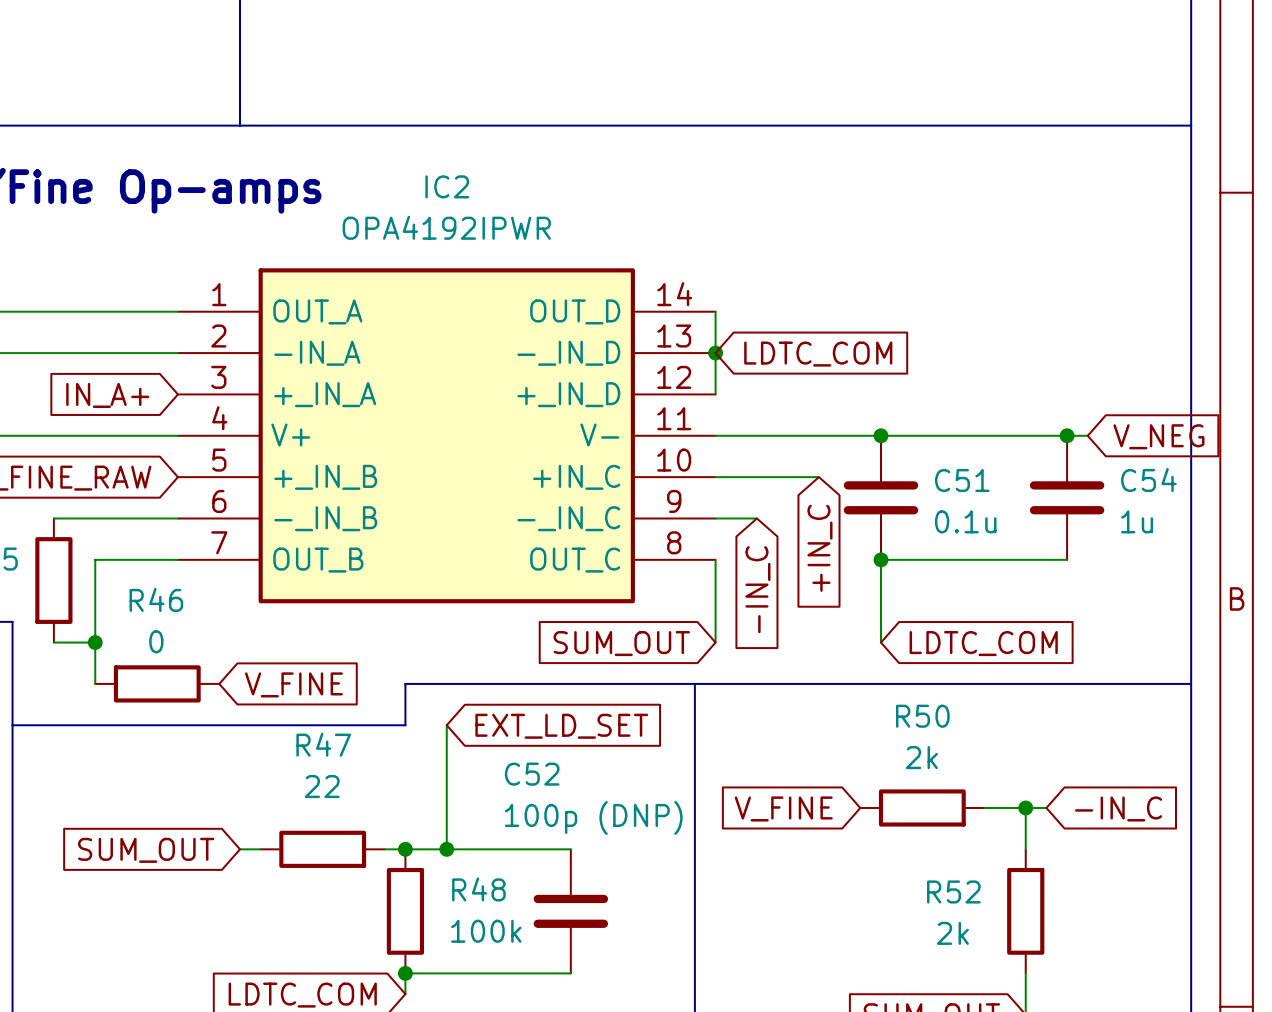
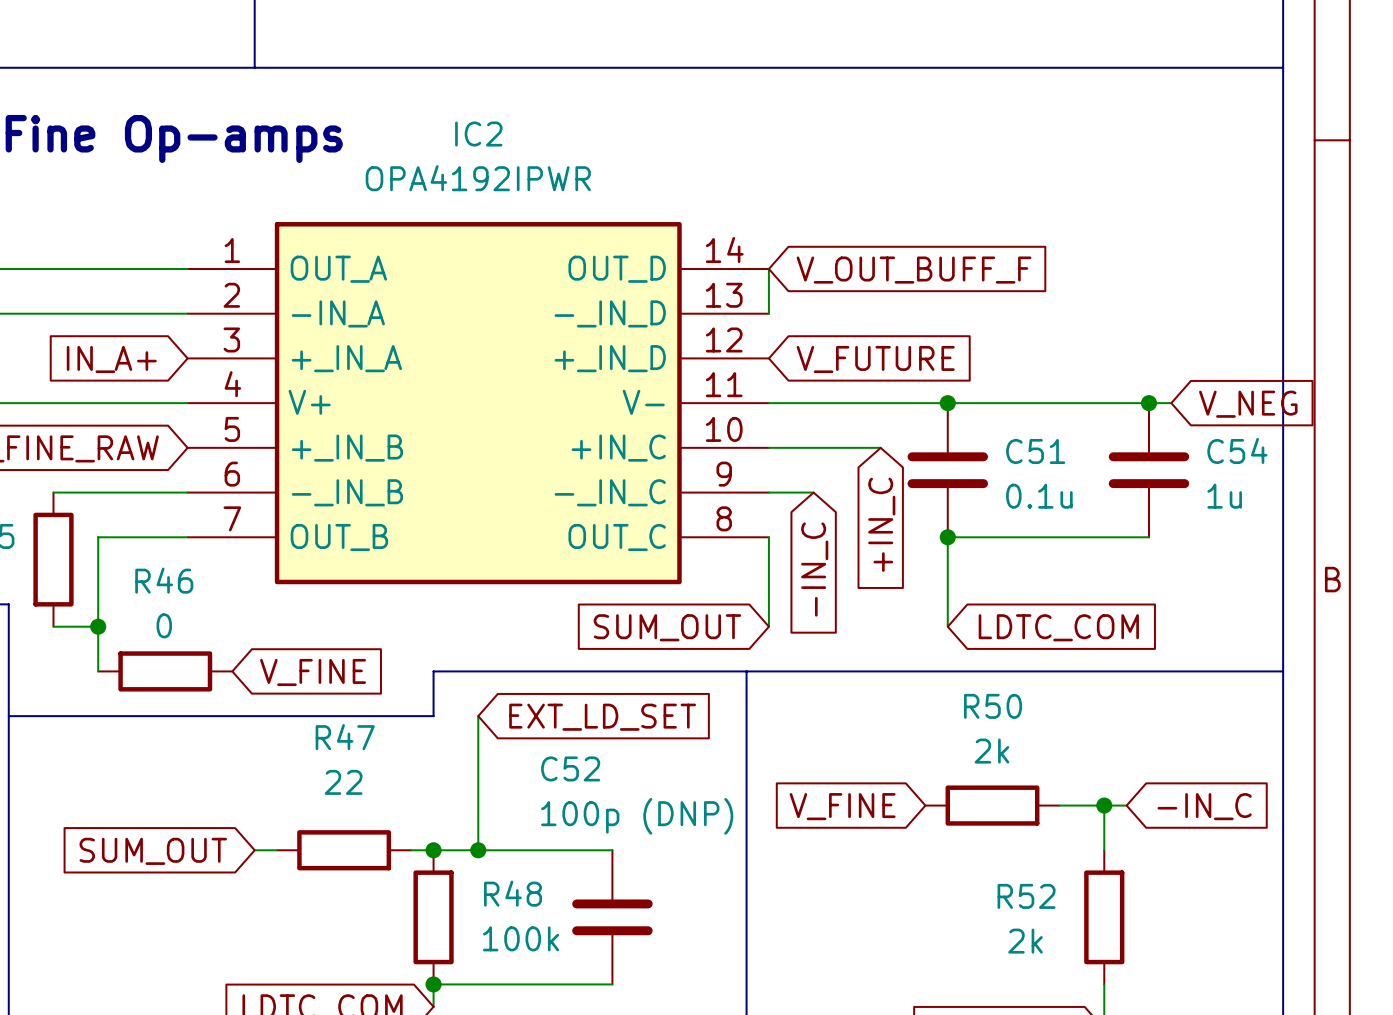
global label: none -> V_OUT_BUFF_F (914, 270)
wire: (715, 353) (715, 394) -> none
junction: (715, 353) -> none
global label: LDTC_COM (818, 354) -> none
global label: none -> V_FUTURE (875, 359)

